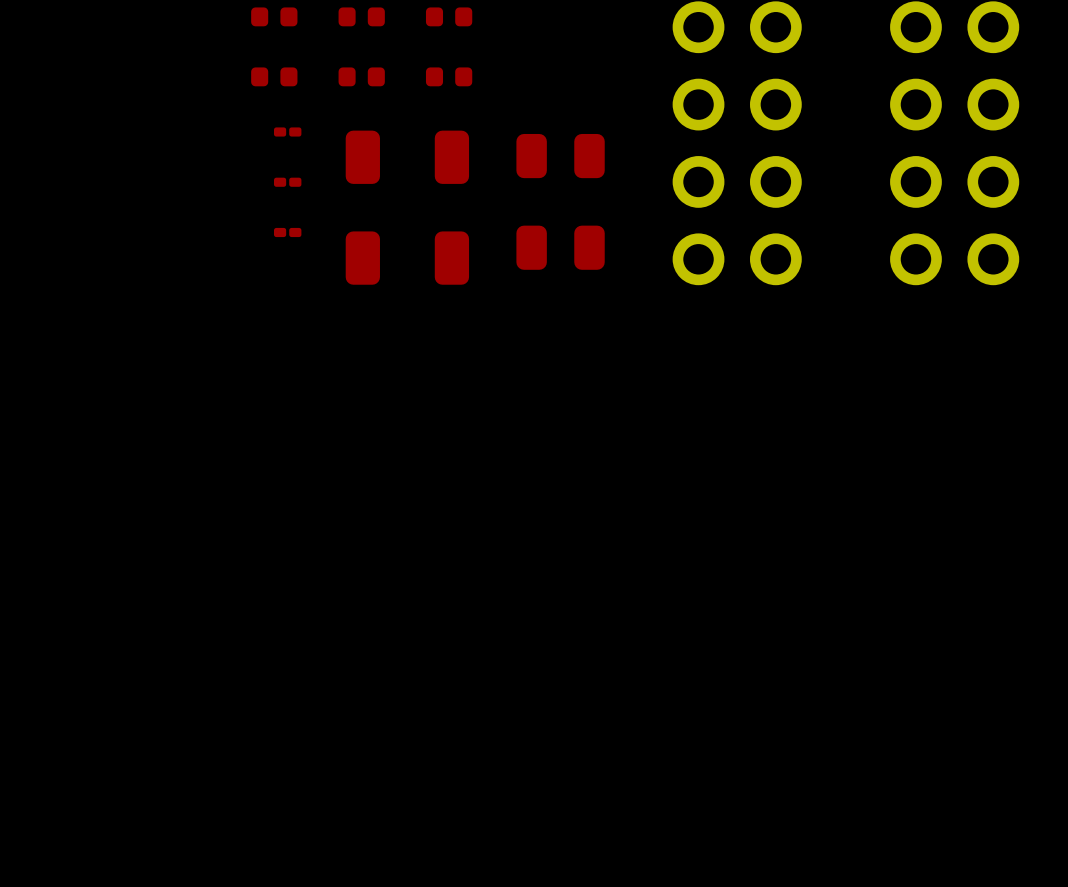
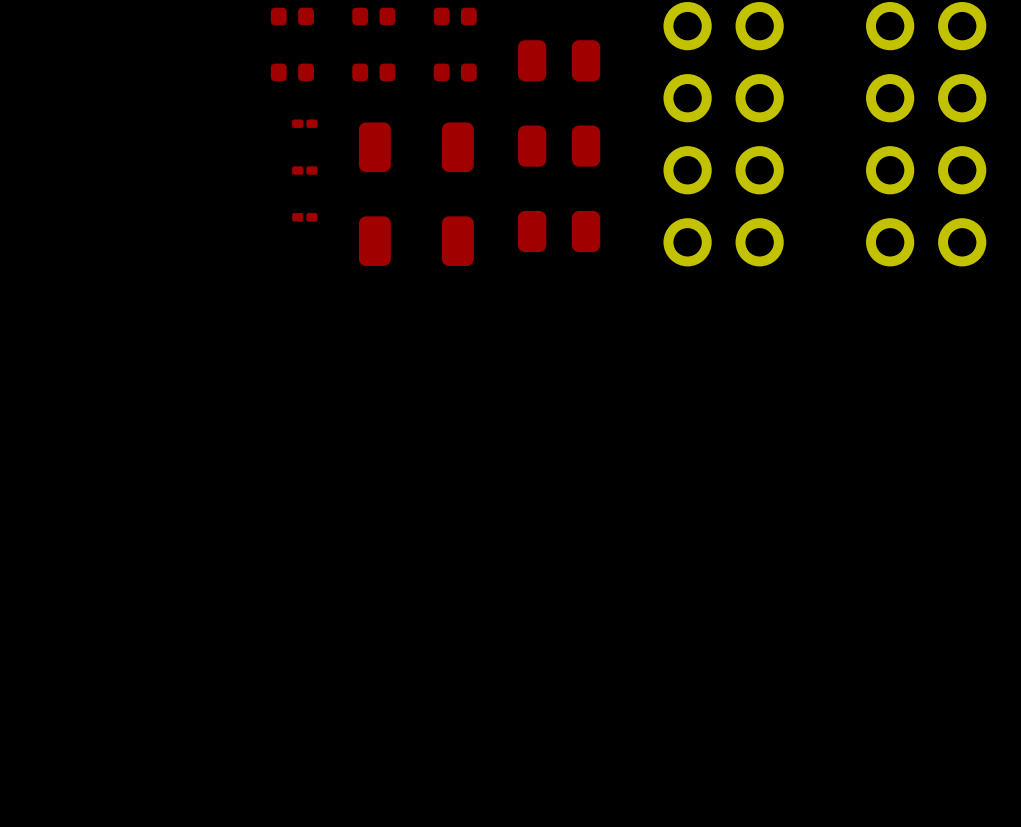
part: none -> (559, 60)

